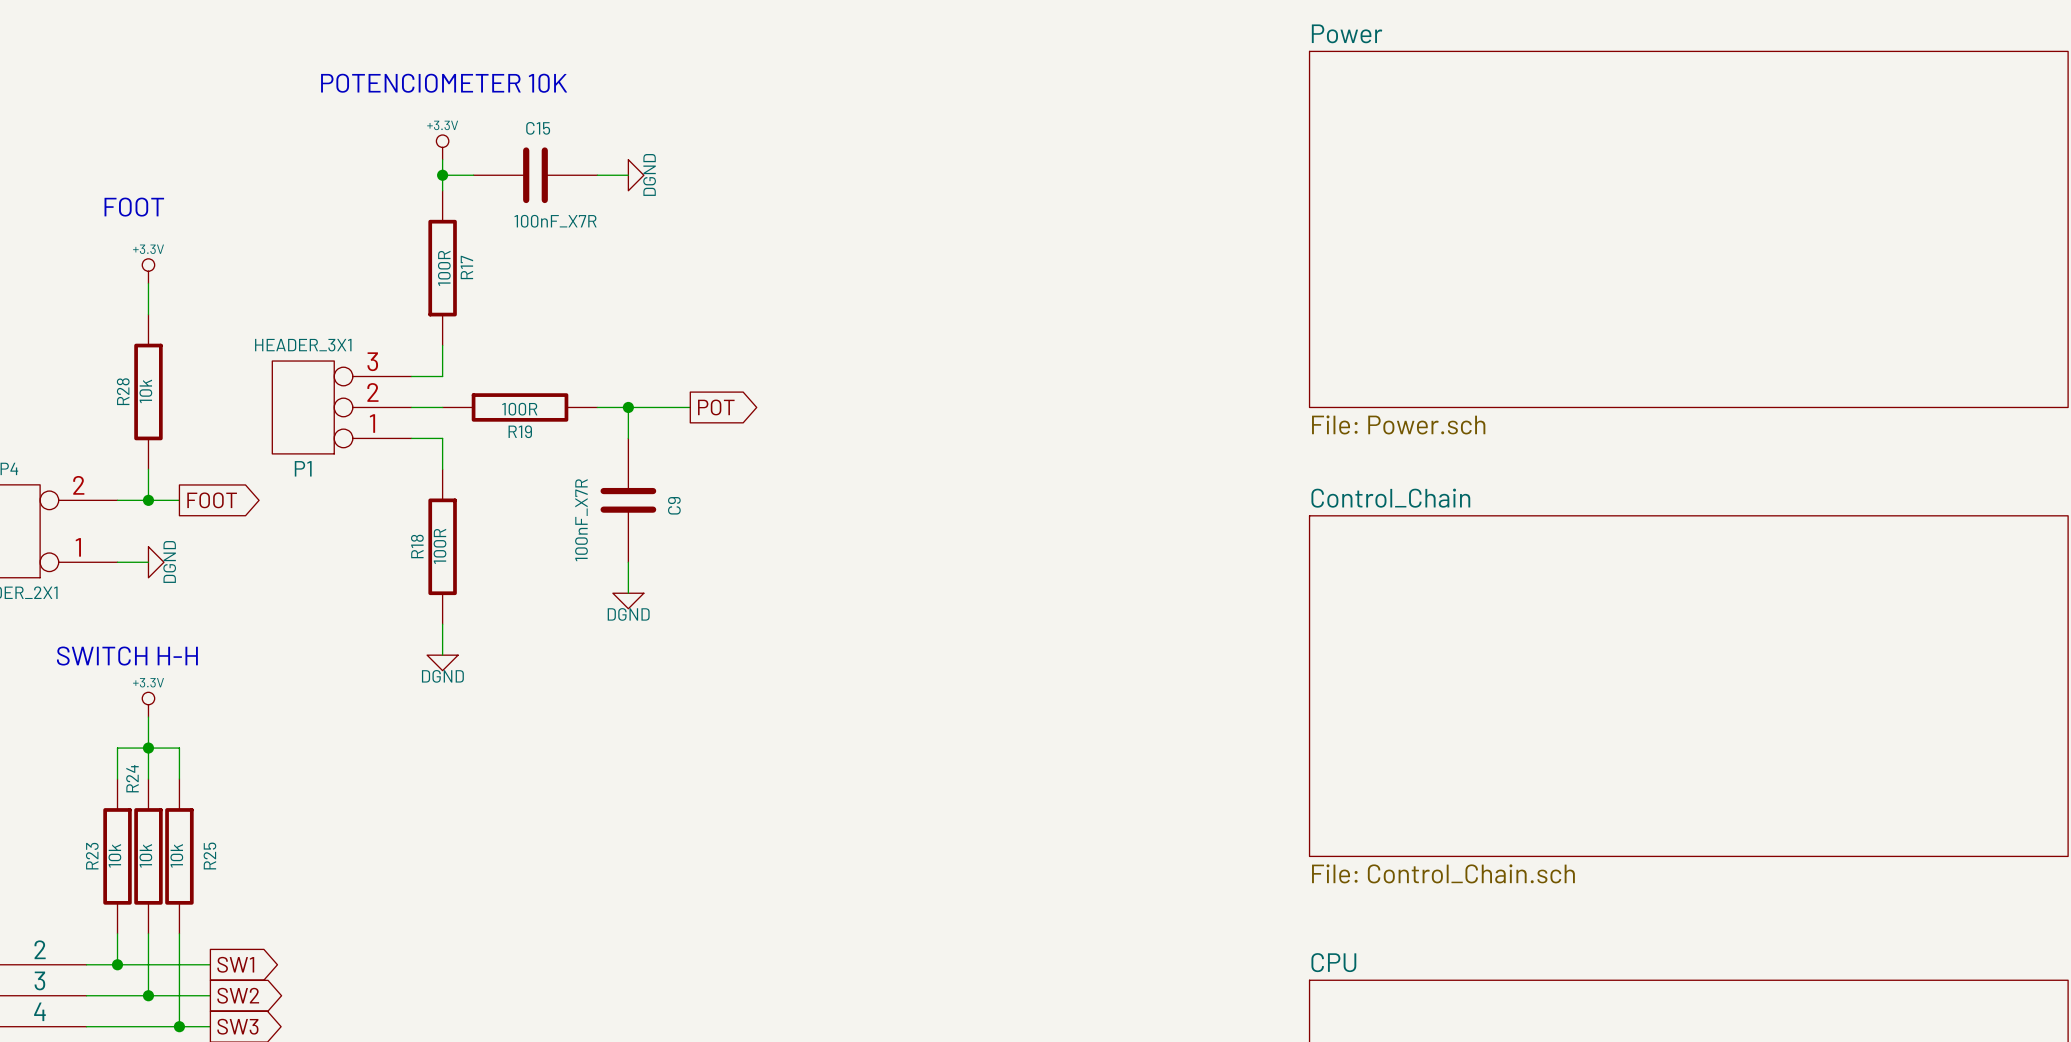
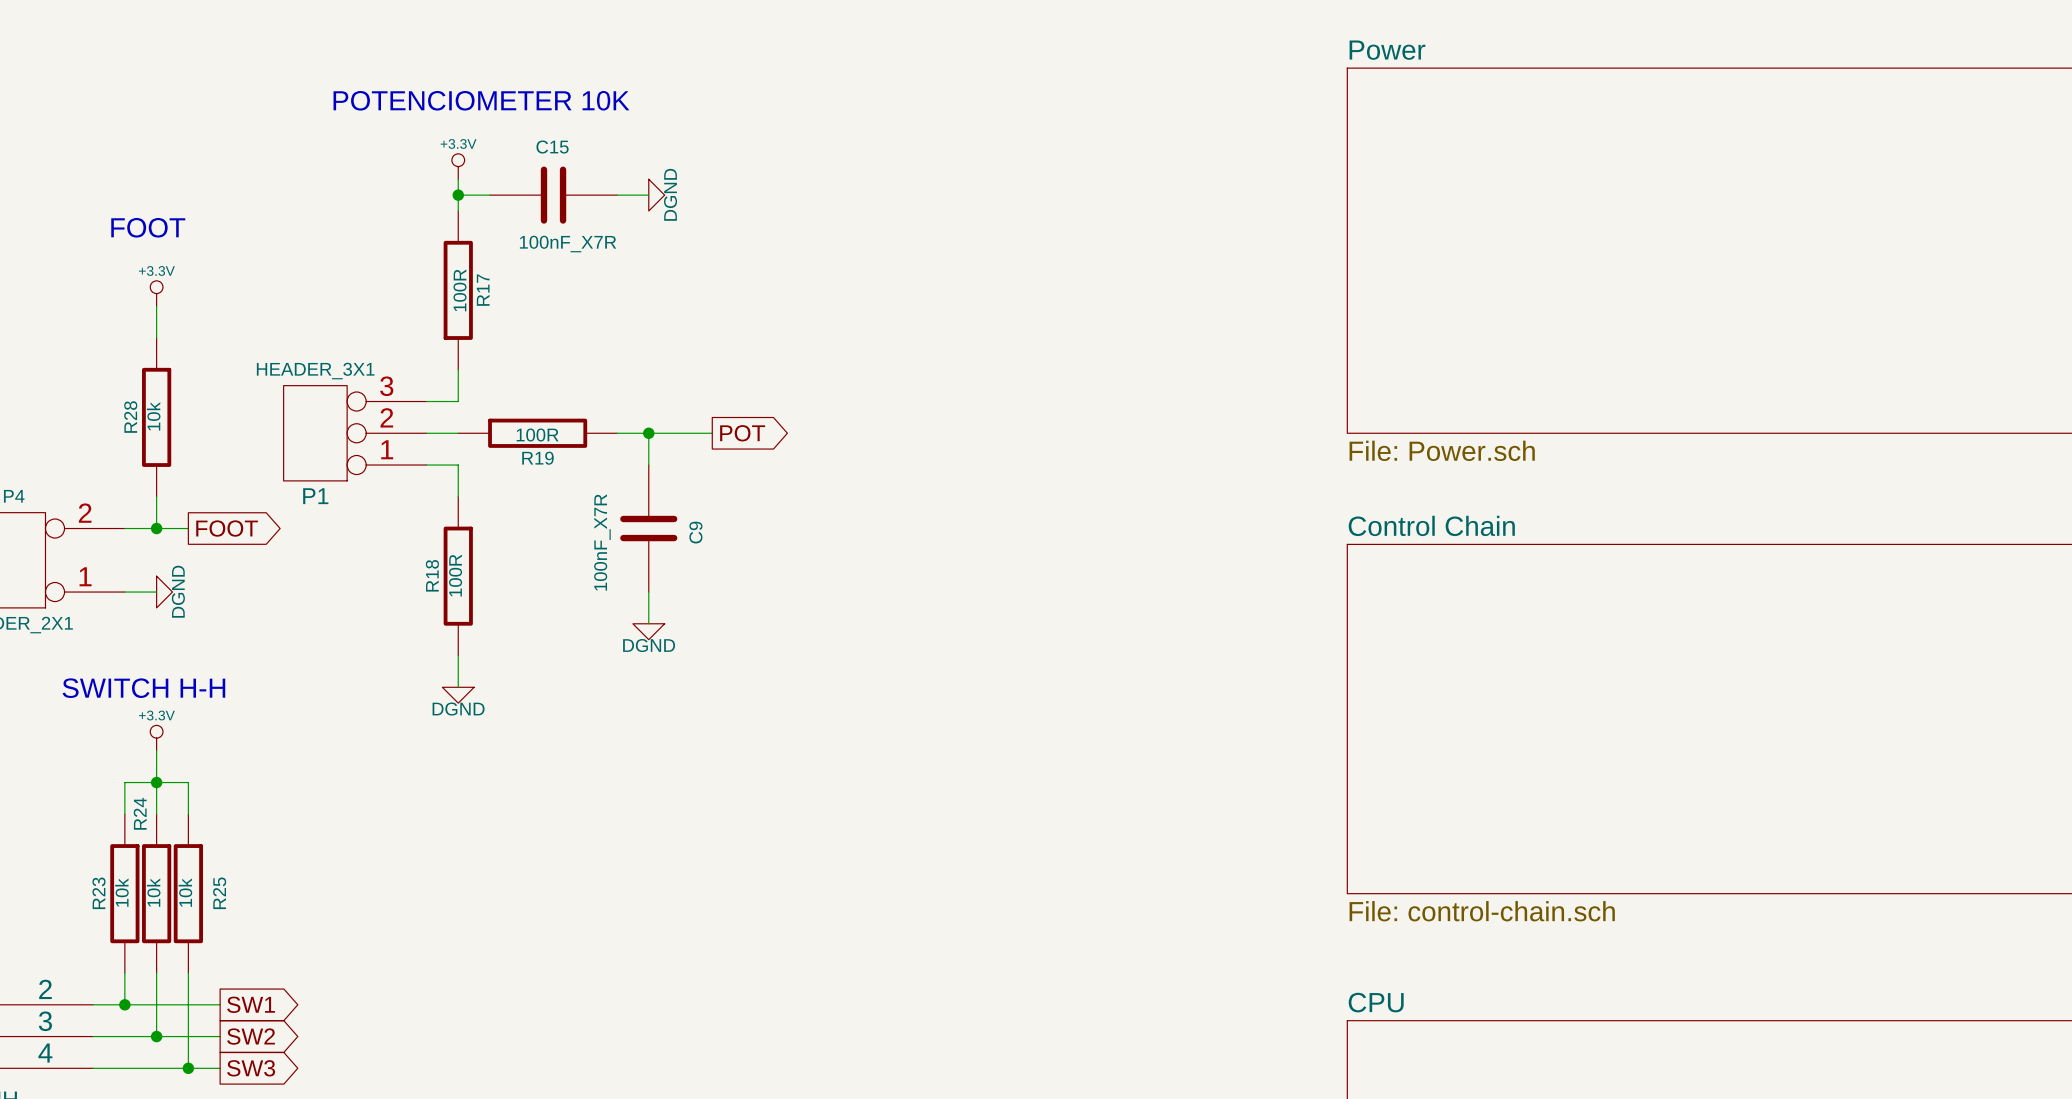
sheet Control_Chain name: Control_Chain (1390, 498) -> Control Chain (1431, 525)
sheet Control_Chain value: File: Control_Chain.sch (1443, 873) -> File: control-chain.sch (1482, 911)

